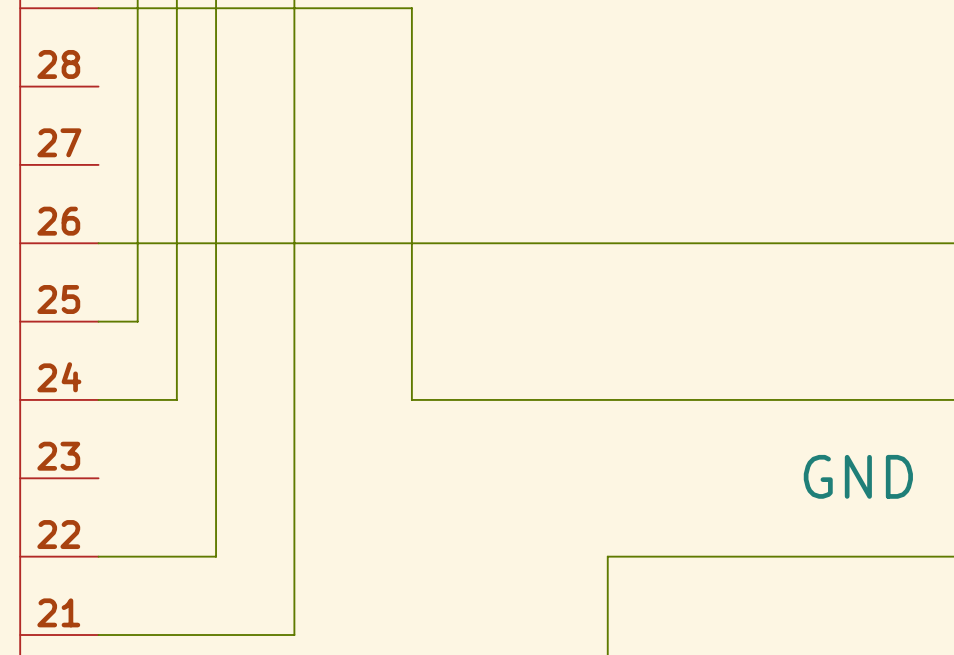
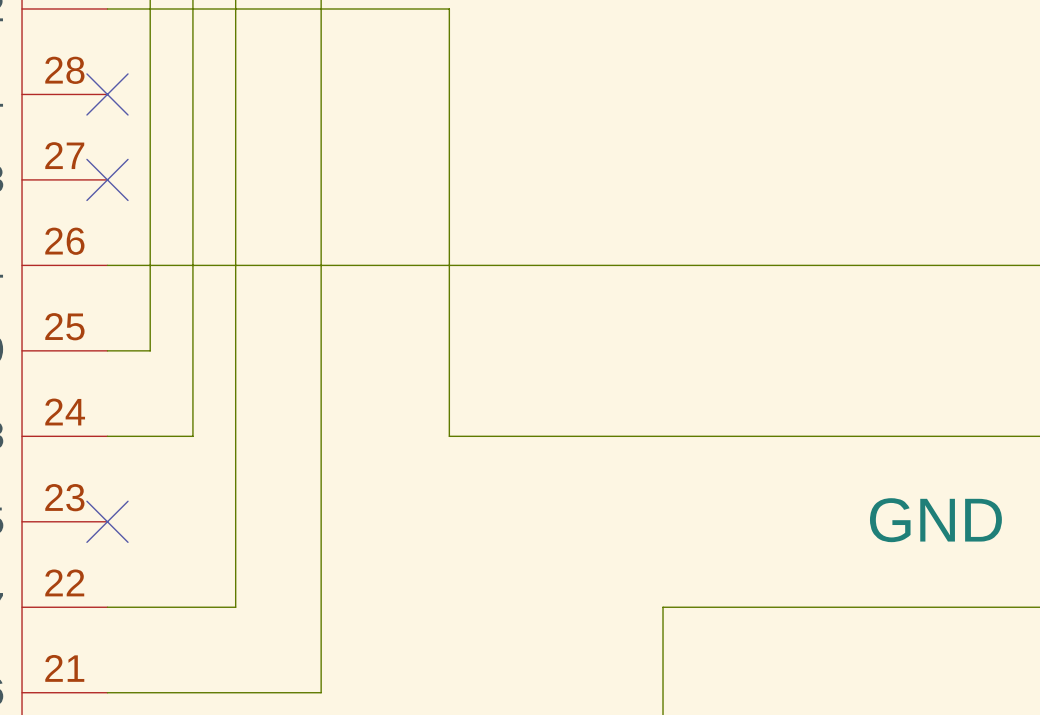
no-connect mark: none -> (107, 94)
no-connect mark: none -> (107, 179)
no-connect mark: none -> (107, 521)

